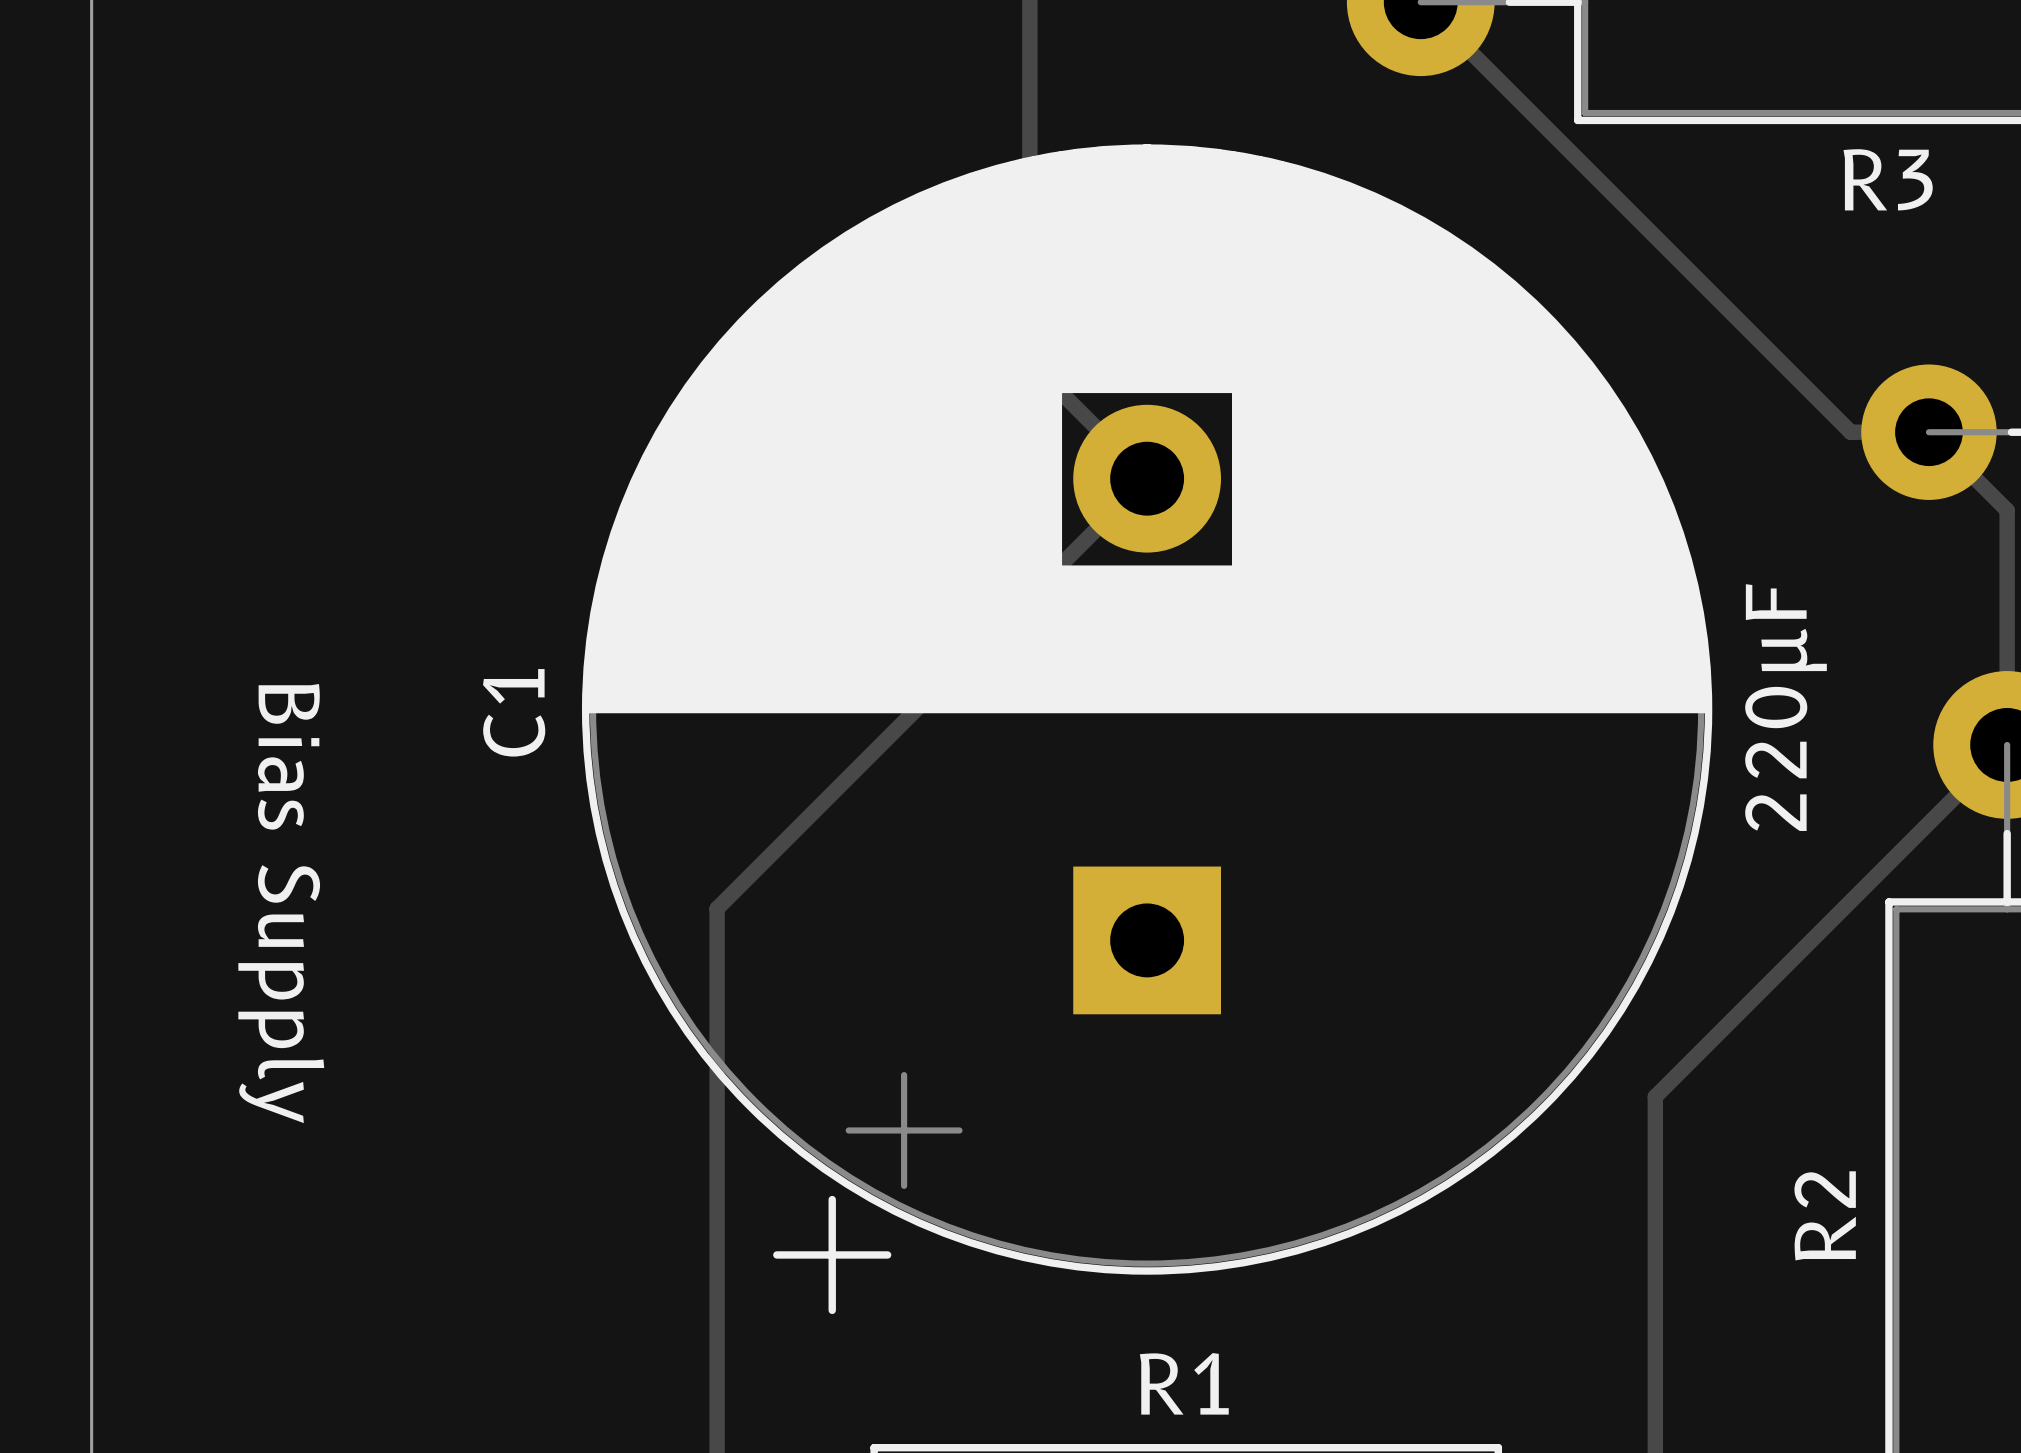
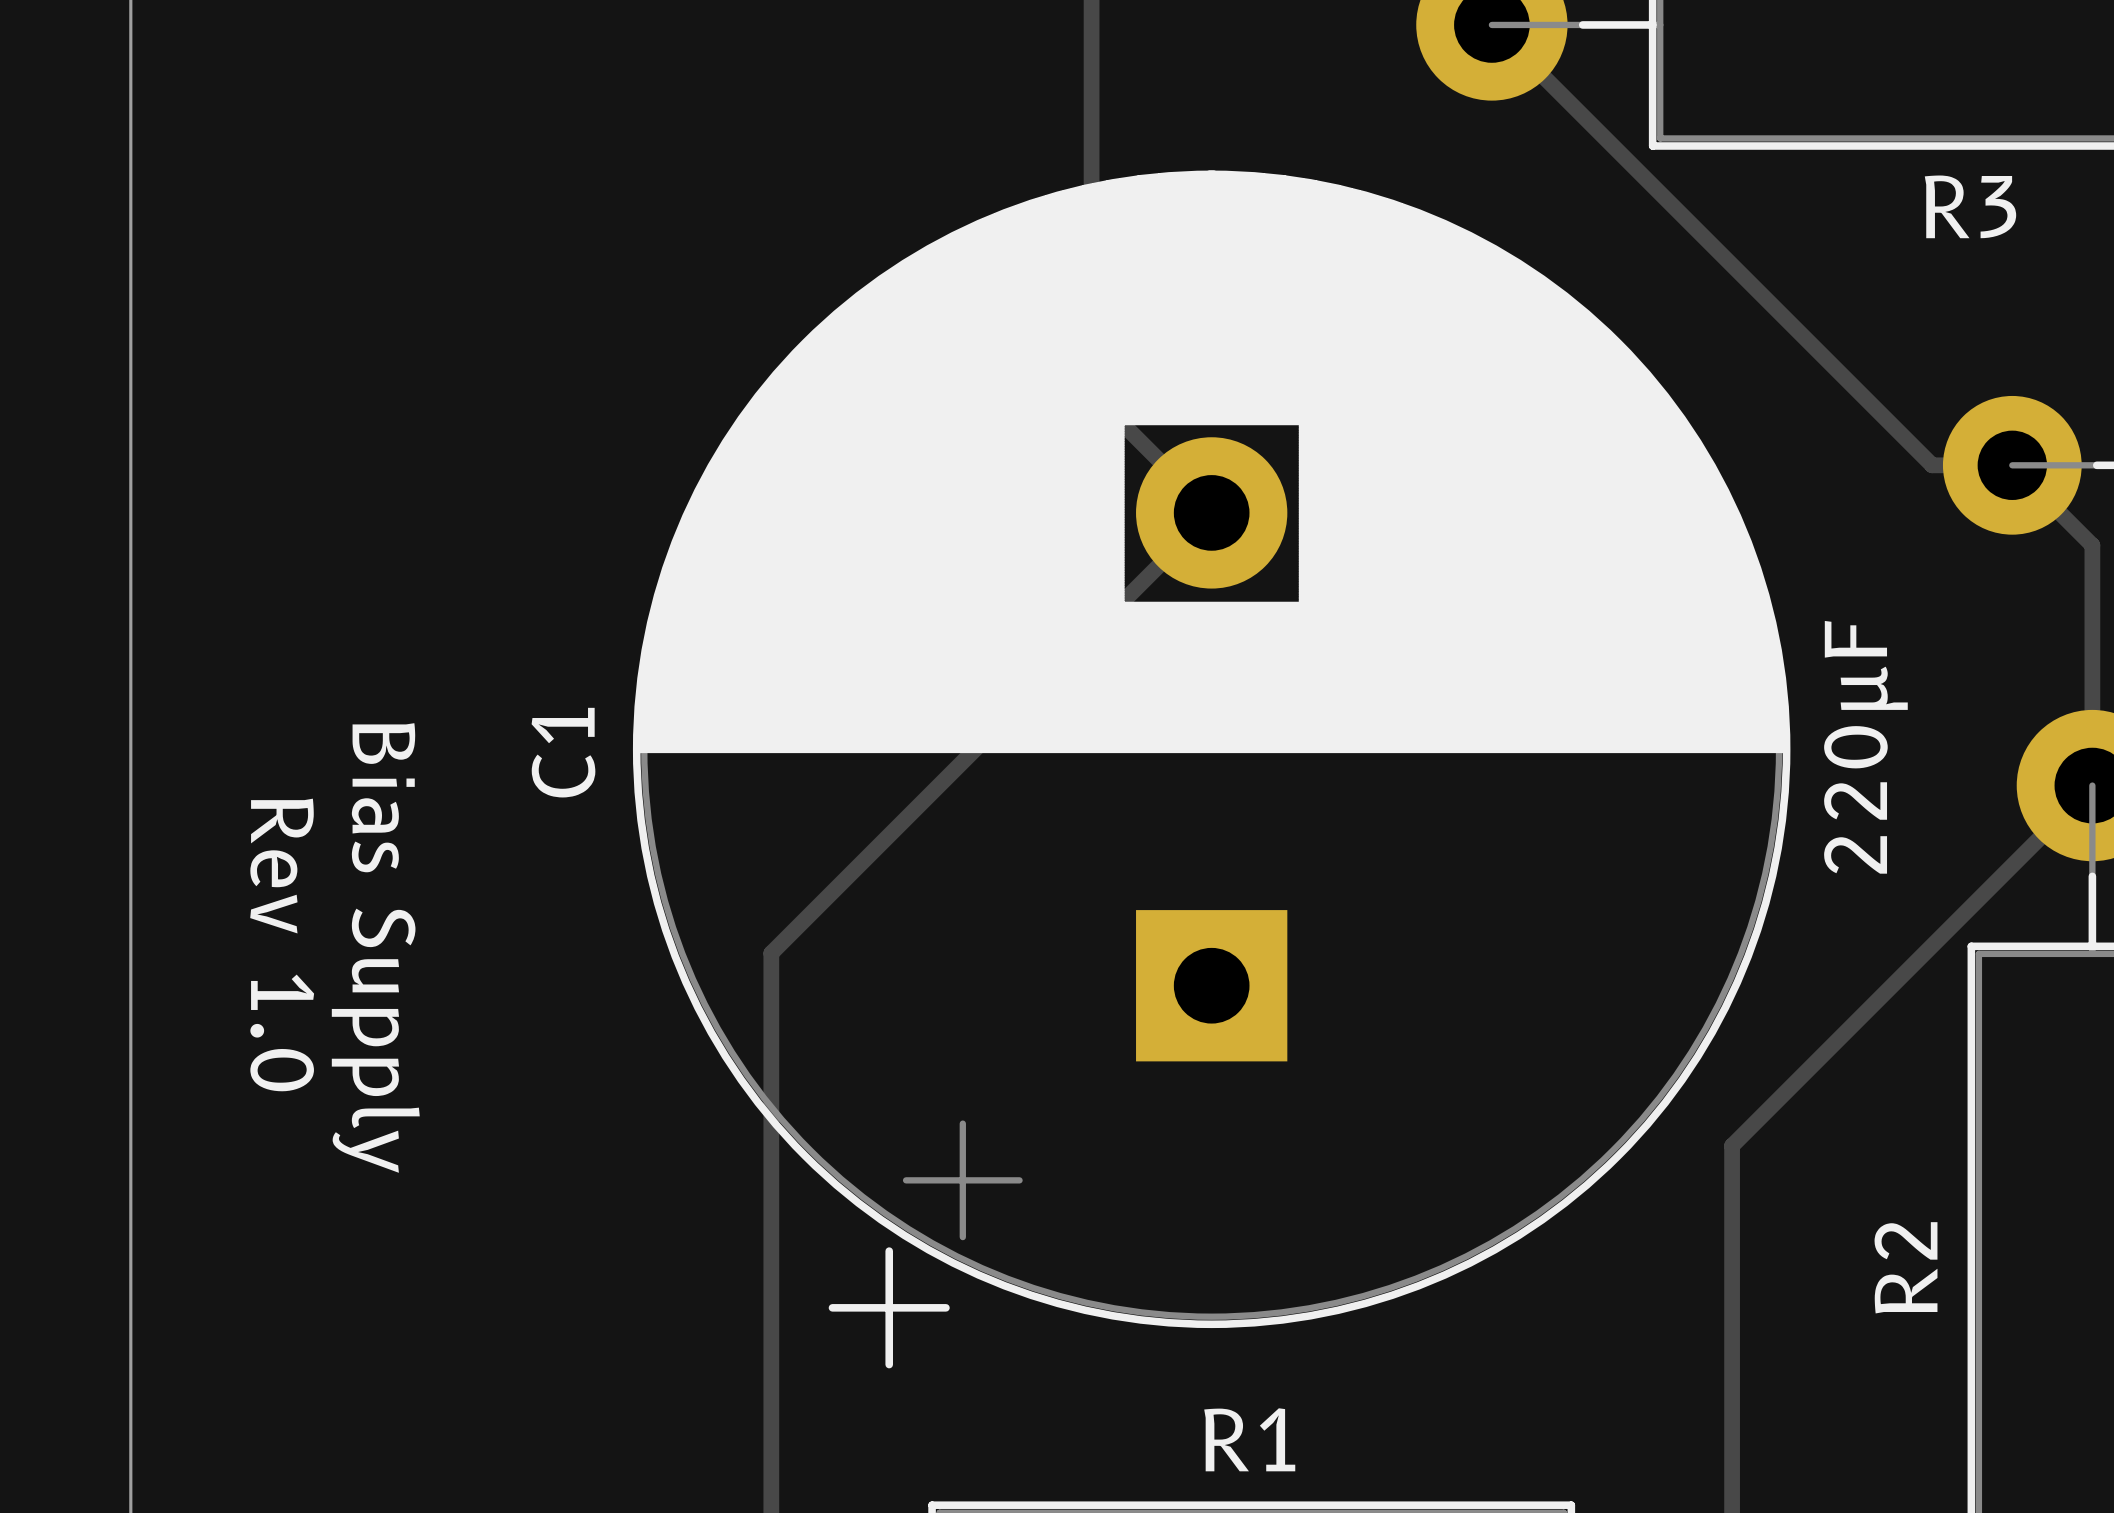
text: none -> Rev 1.0 (282, 944)
text position: Bias Supply (281, 903) -> Bias Supply (375, 948)

